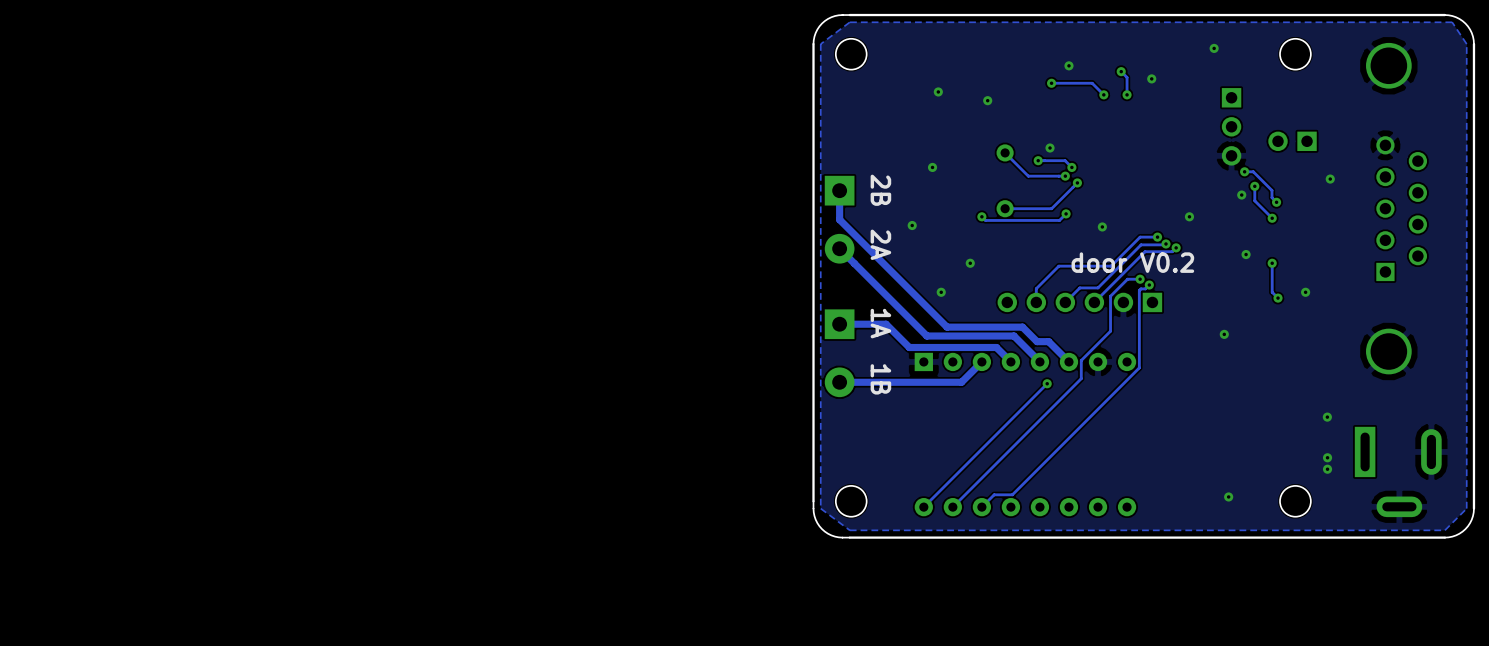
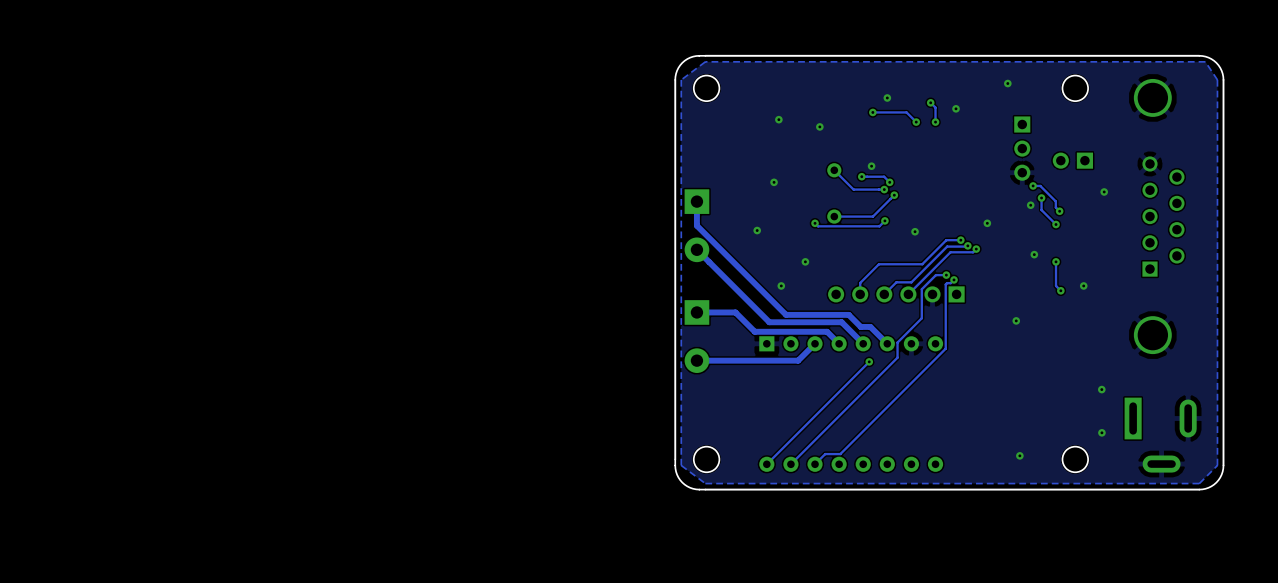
text: 2B (880, 190) -> none
text: 2A (880, 244) -> none
text: door V0.2 (1132, 262) -> none
text: 1A (880, 323) -> none
text: 1B (880, 379) -> none
via: (1327, 457) -> none

